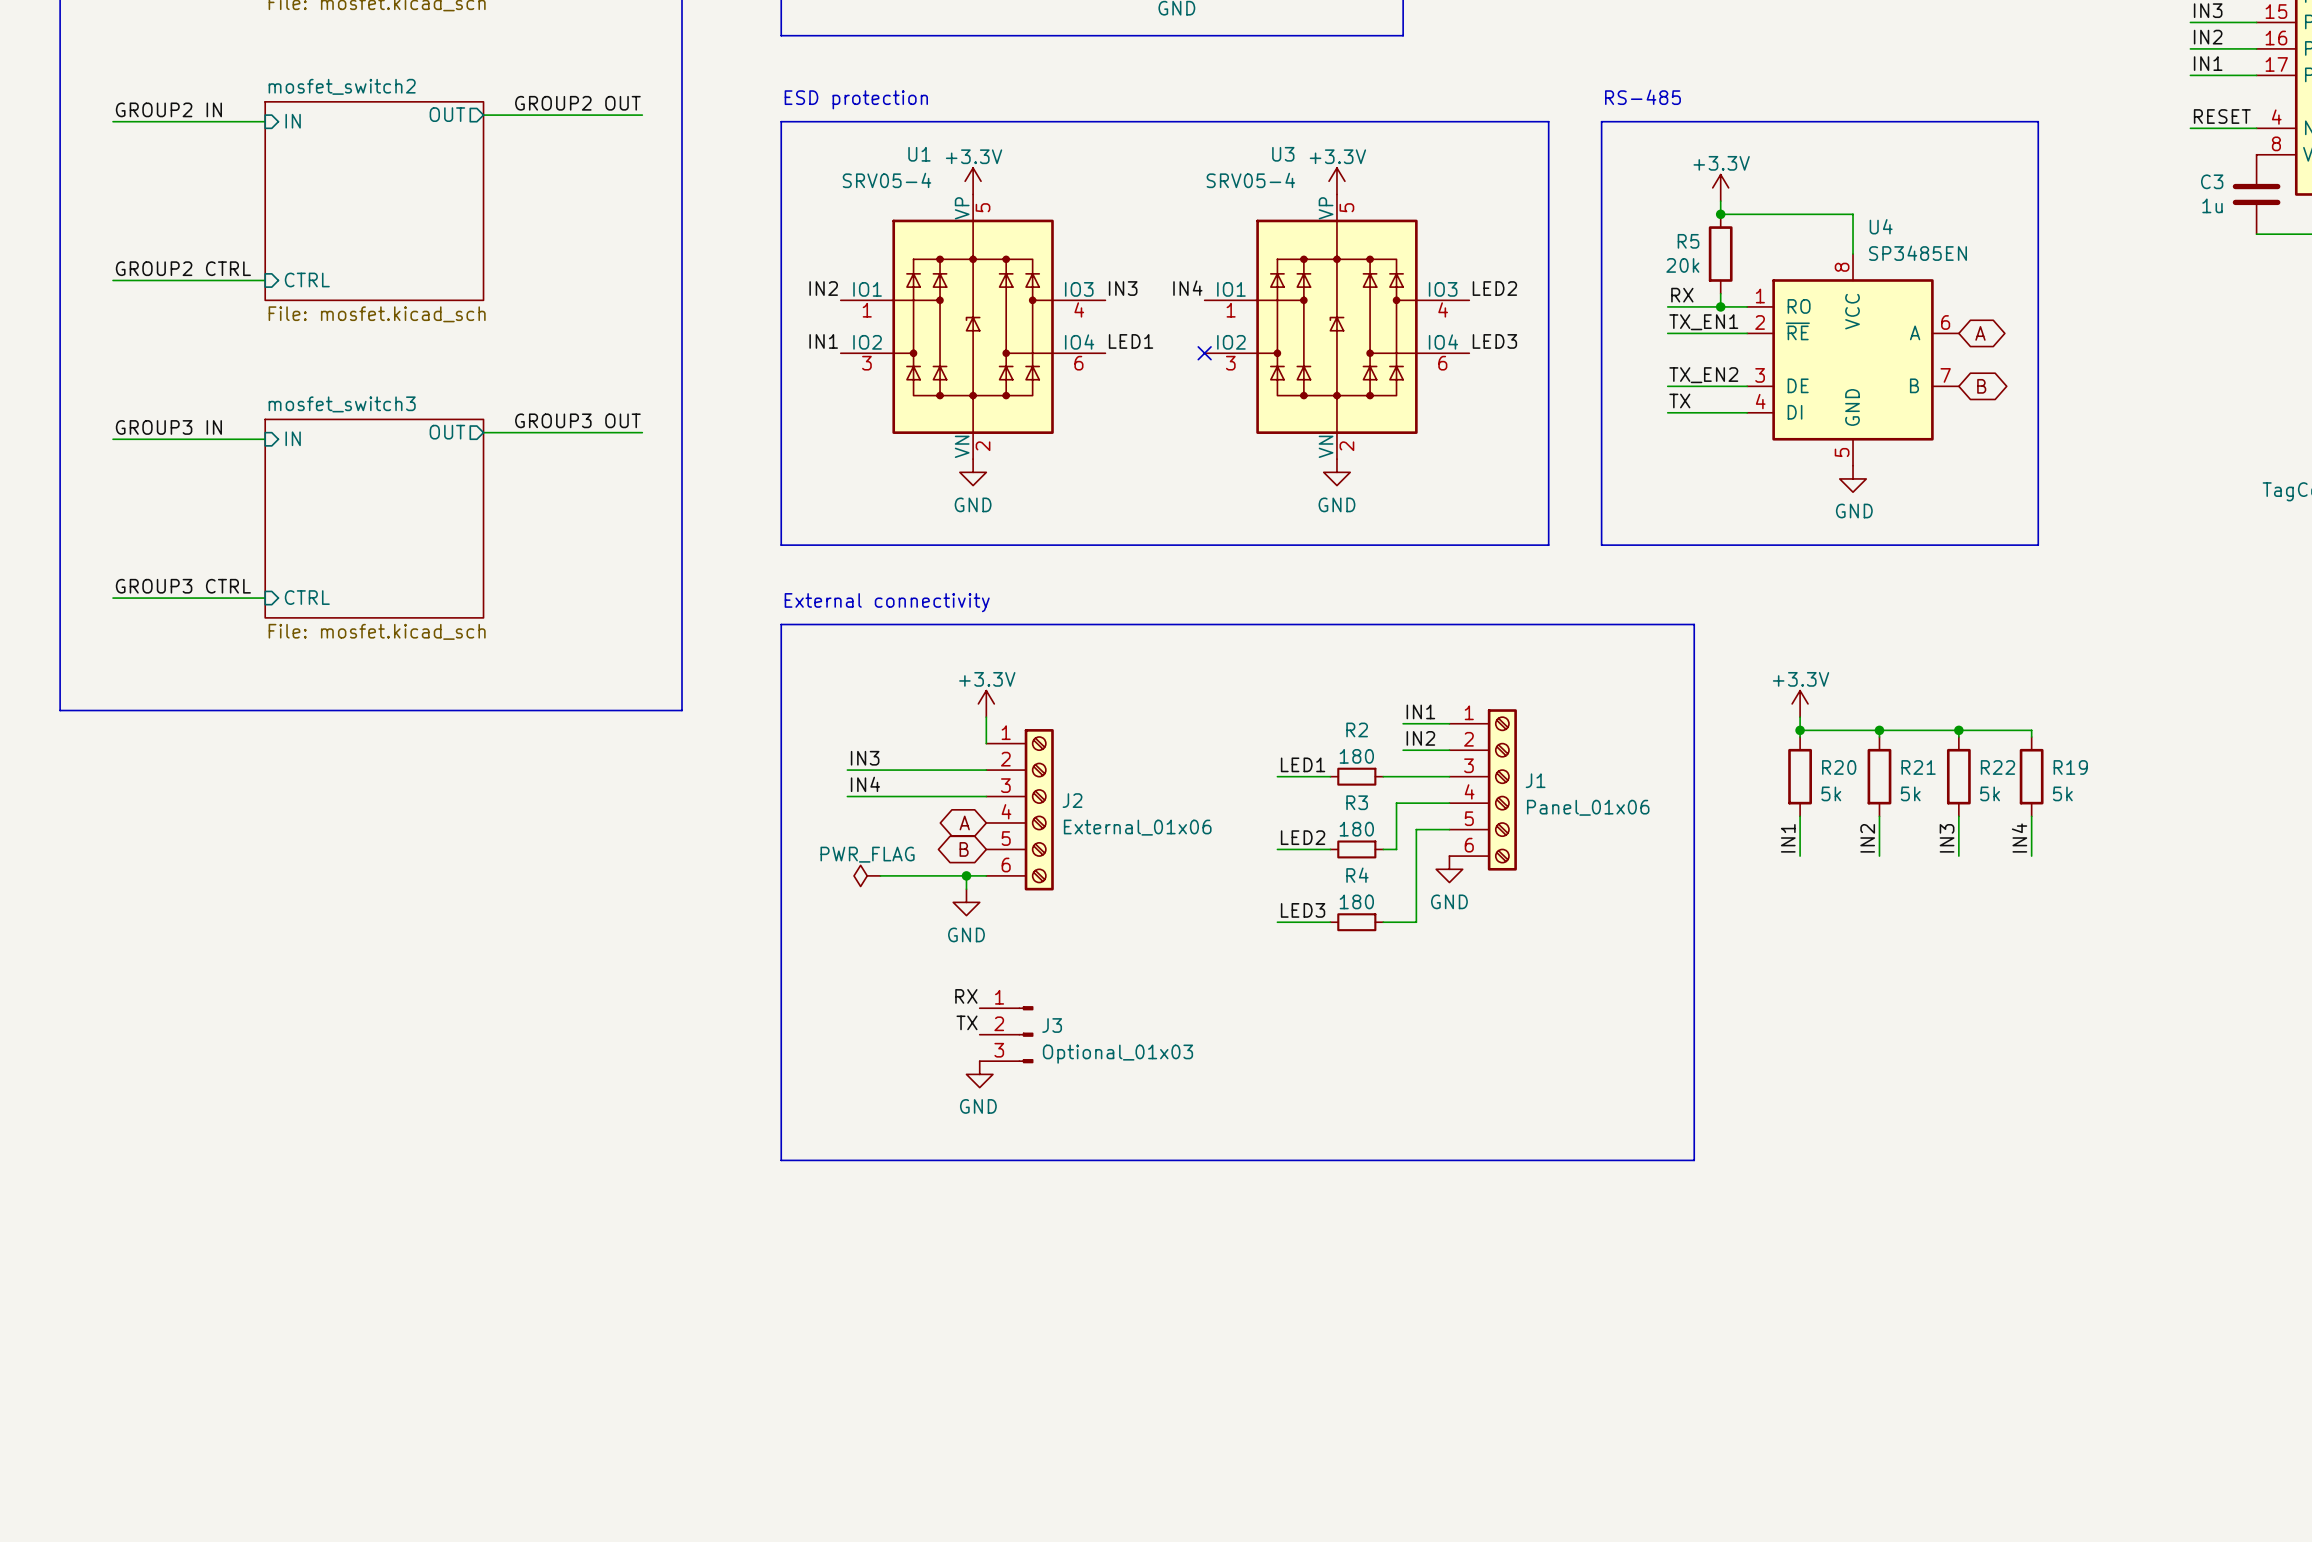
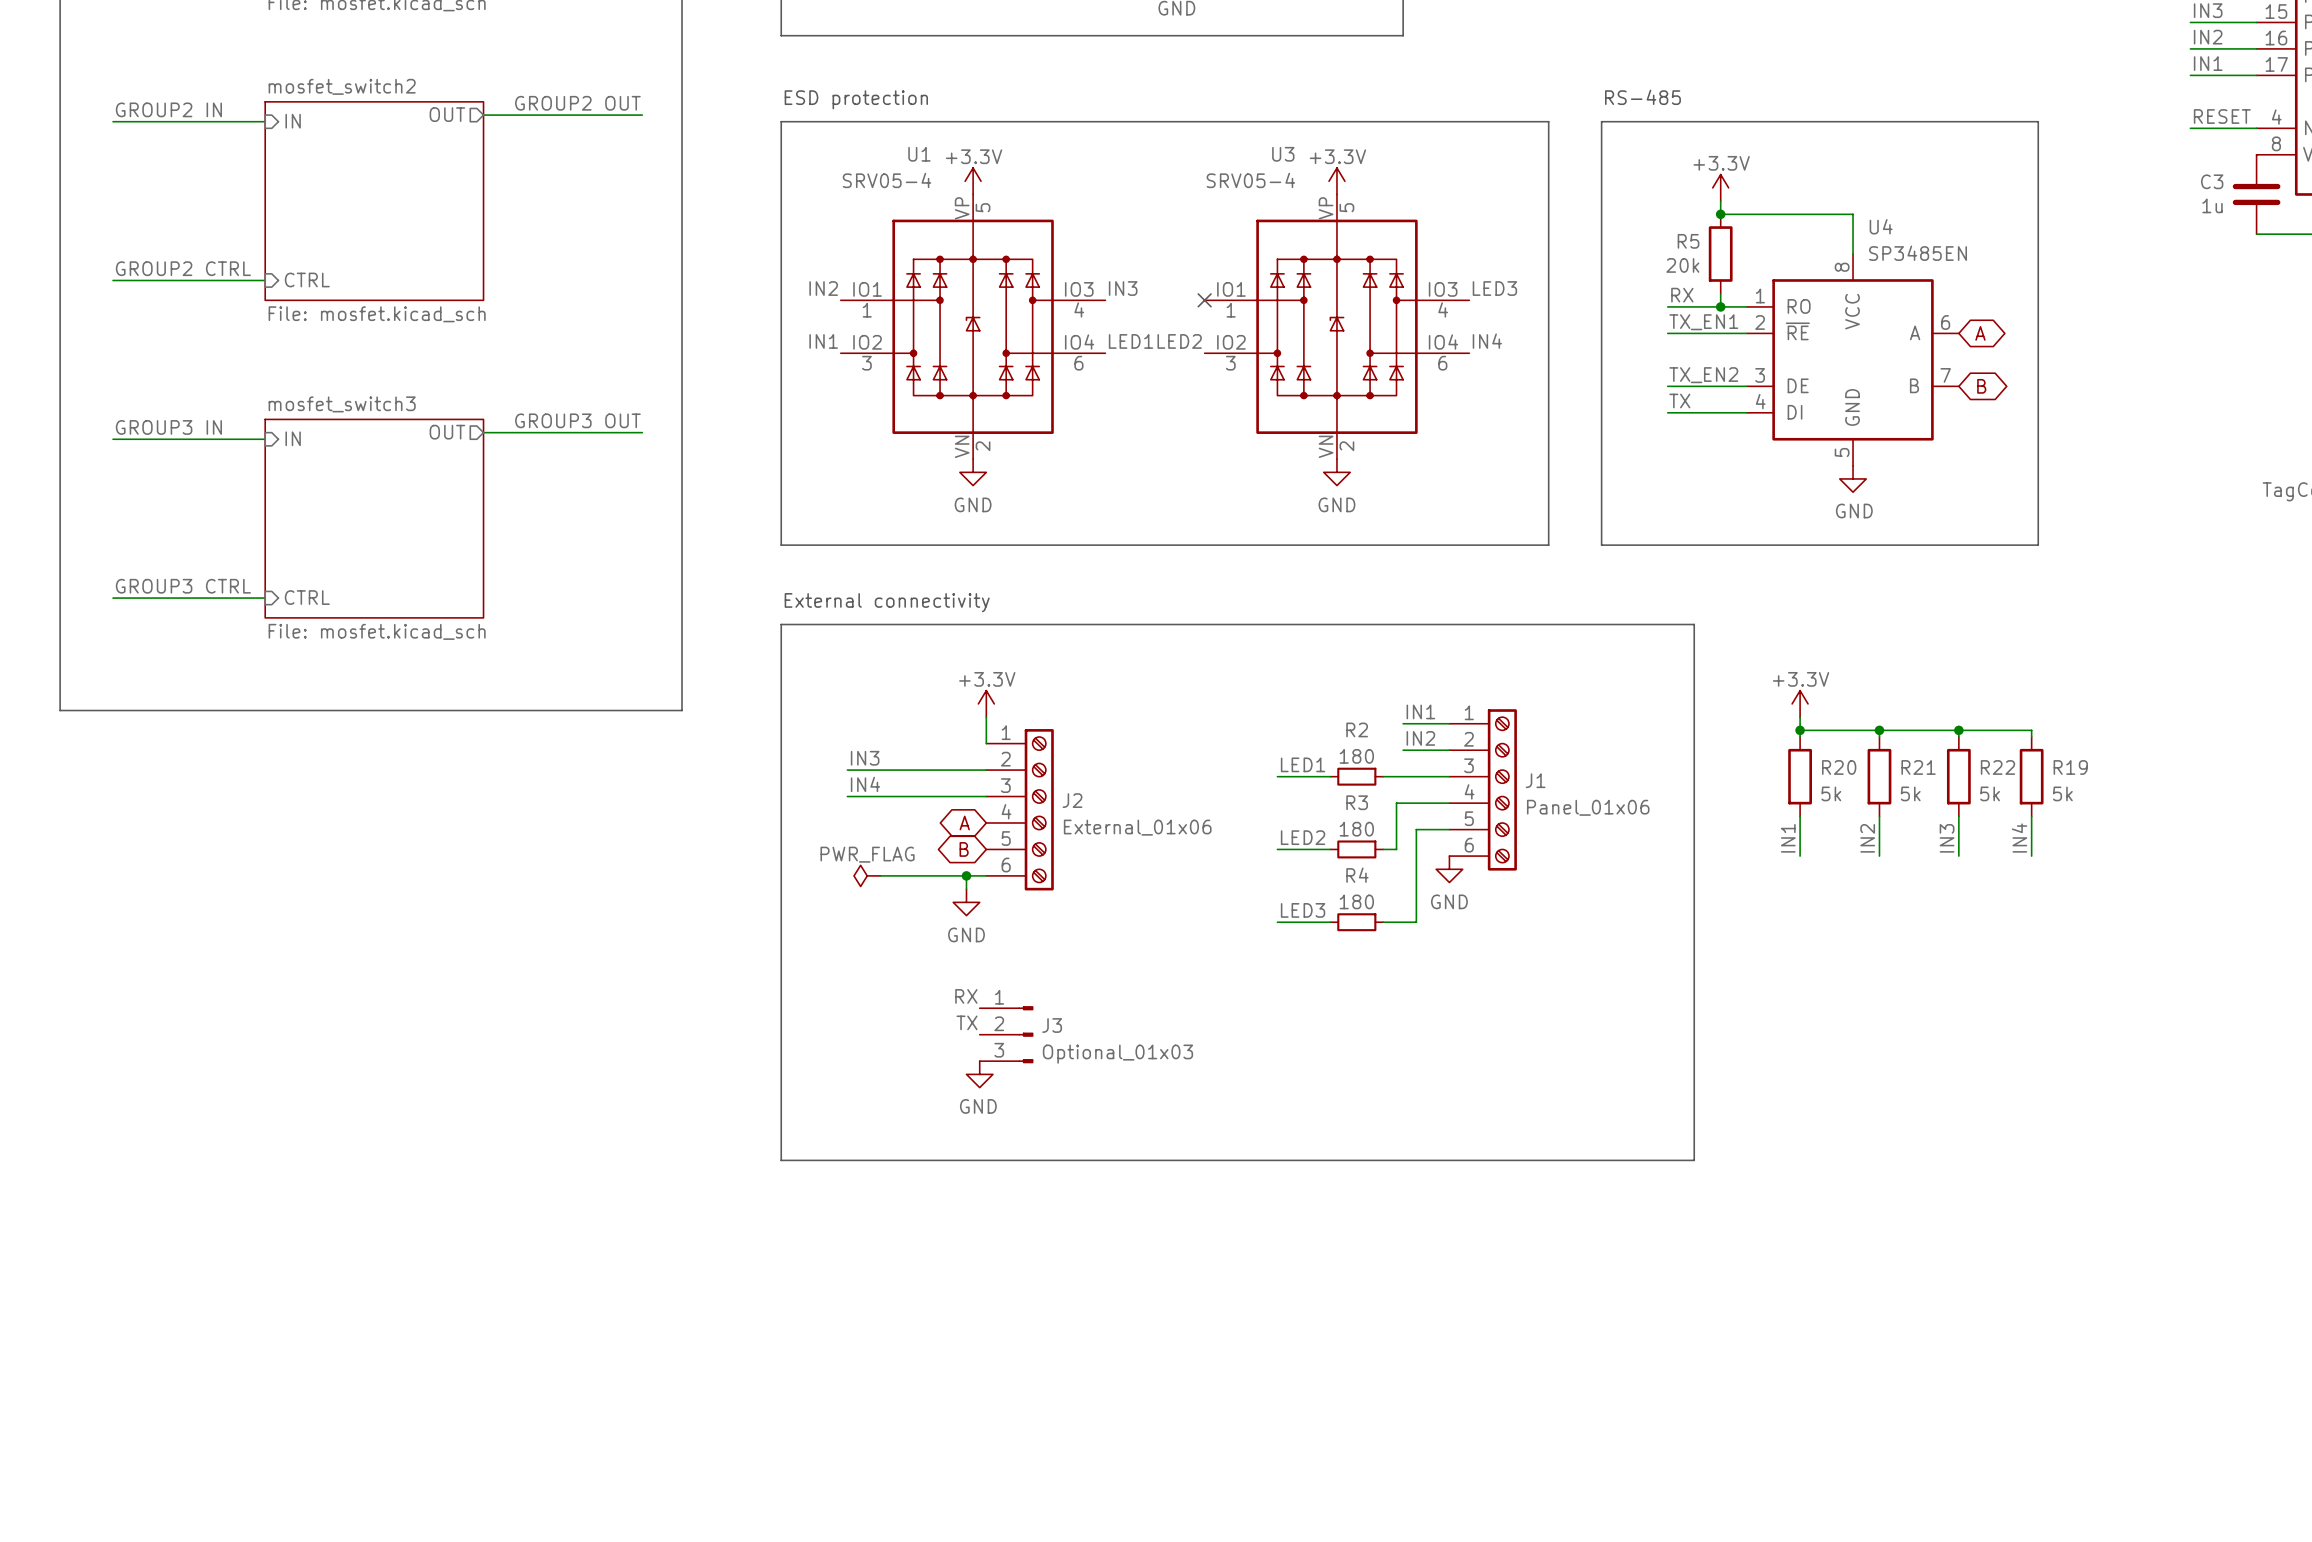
label: IN4 (1187, 288) -> none
label: LED2 (1494, 288) -> LED3 (1494, 288)
label: none -> LED2 (1179, 341)
label: LED3 (1494, 341) -> IN4 (1487, 341)
no-connect mark position: (1204, 353) -> (1204, 300)

